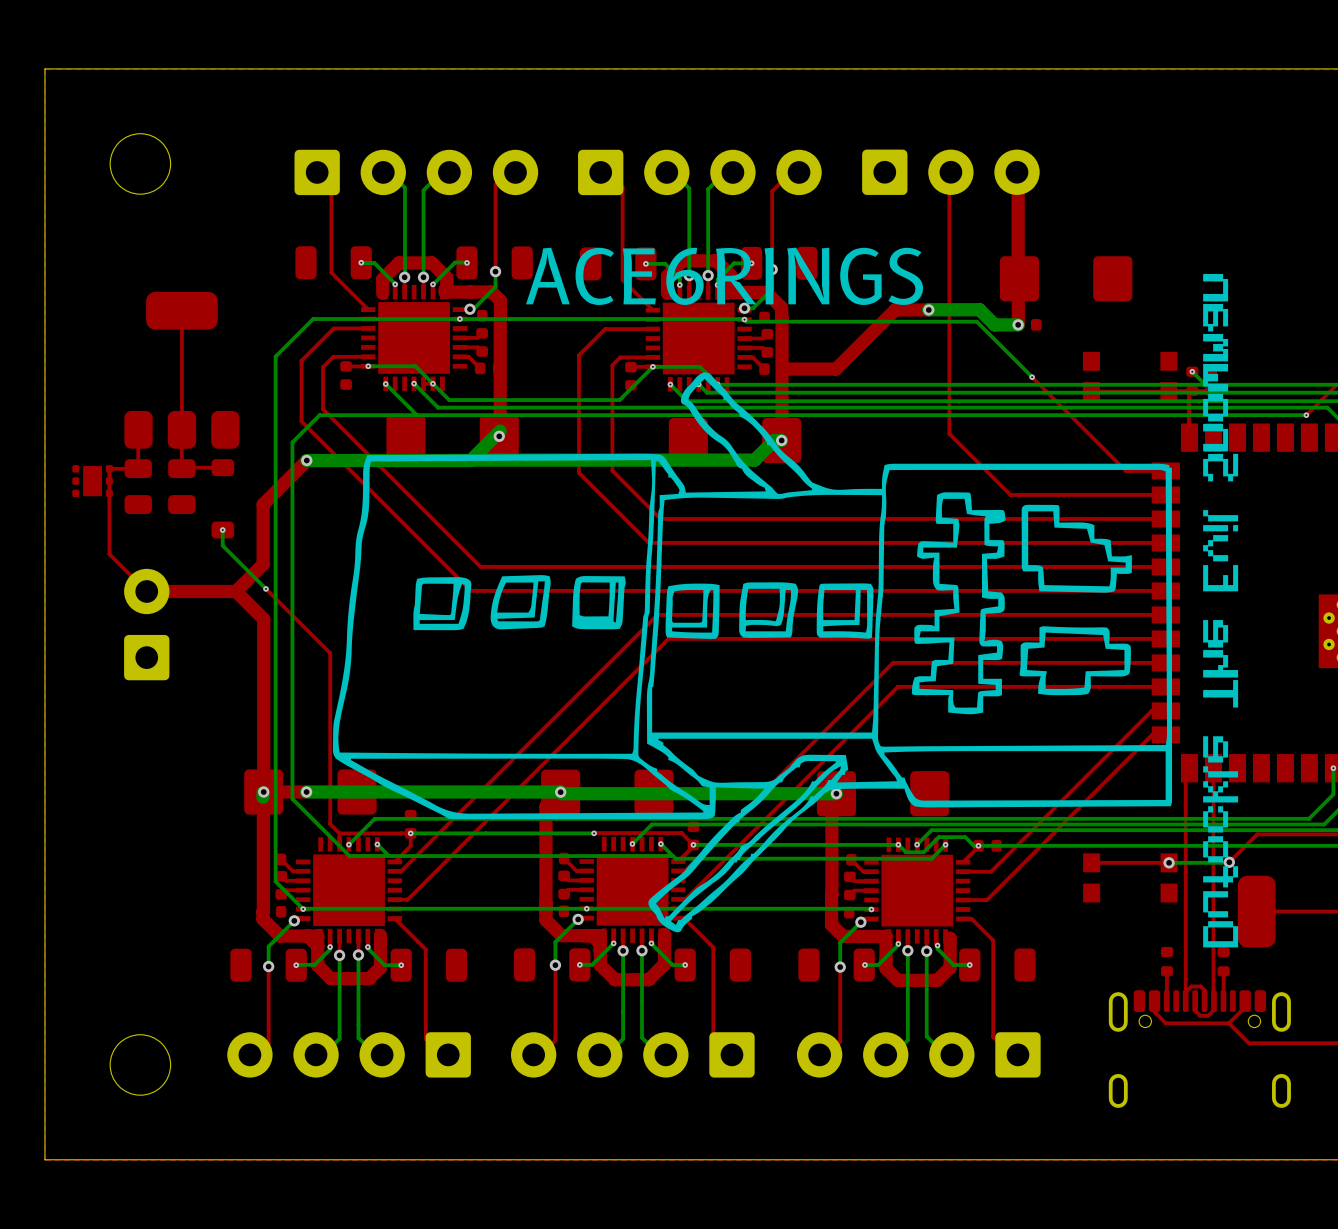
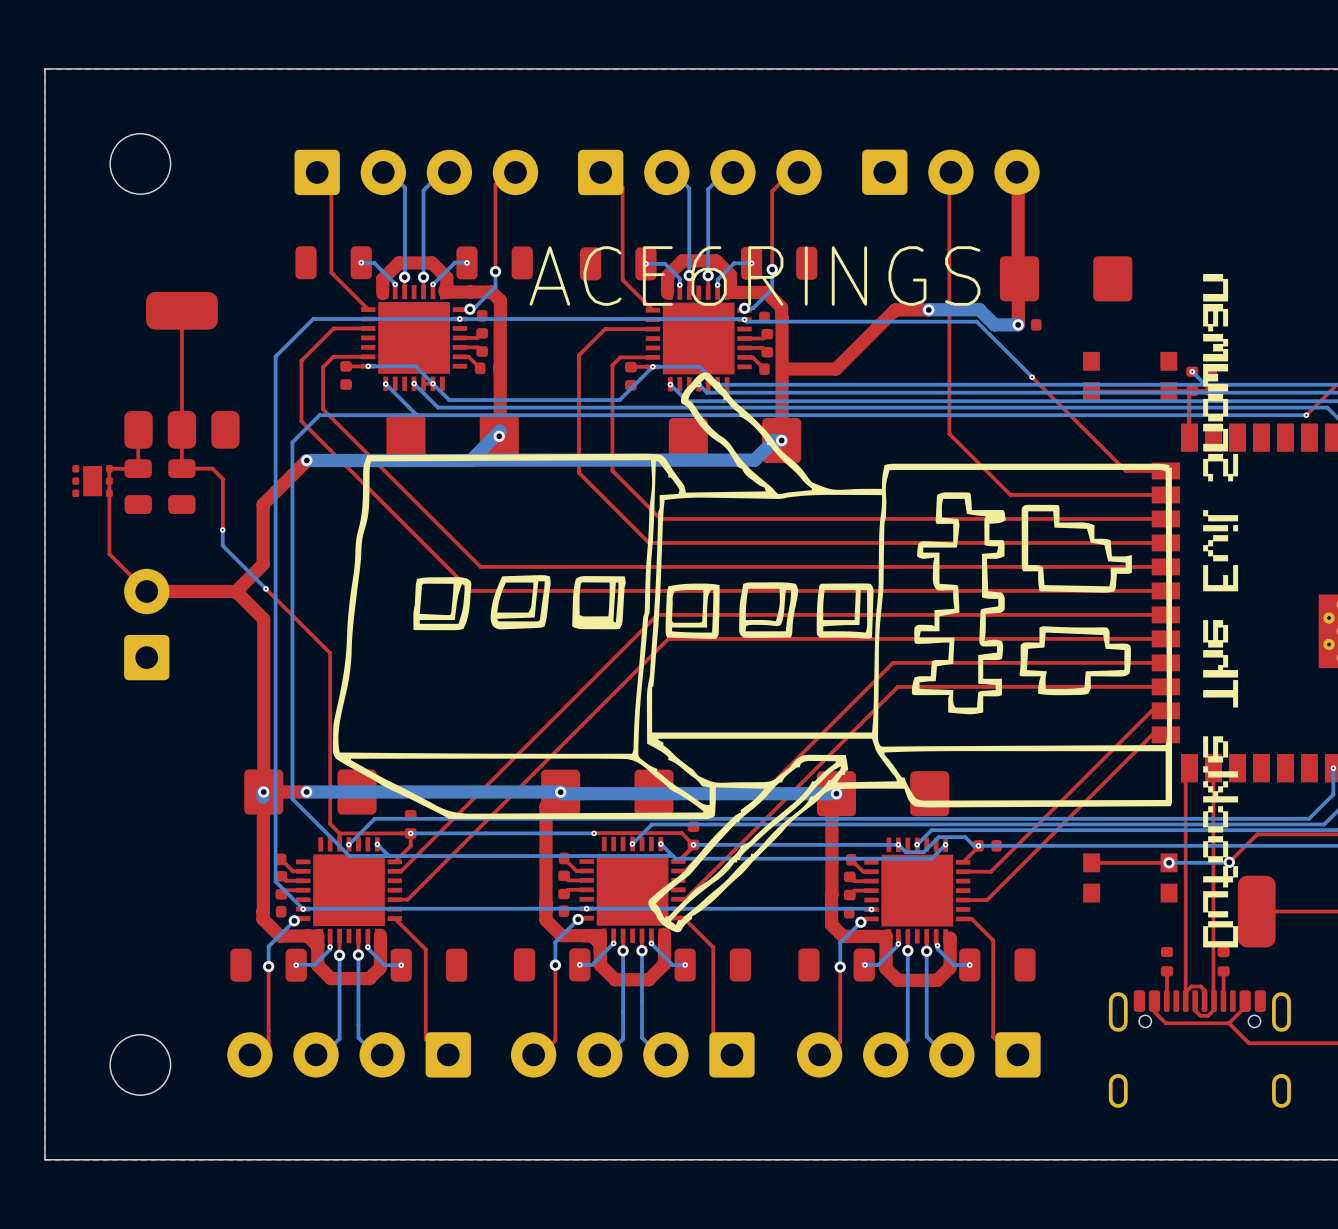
top track: (222, 467) (182, 467) -> none
top track: none -> (181, 468) (212, 468) (222, 479) (222, 529)
part: (222, 498) -> none

